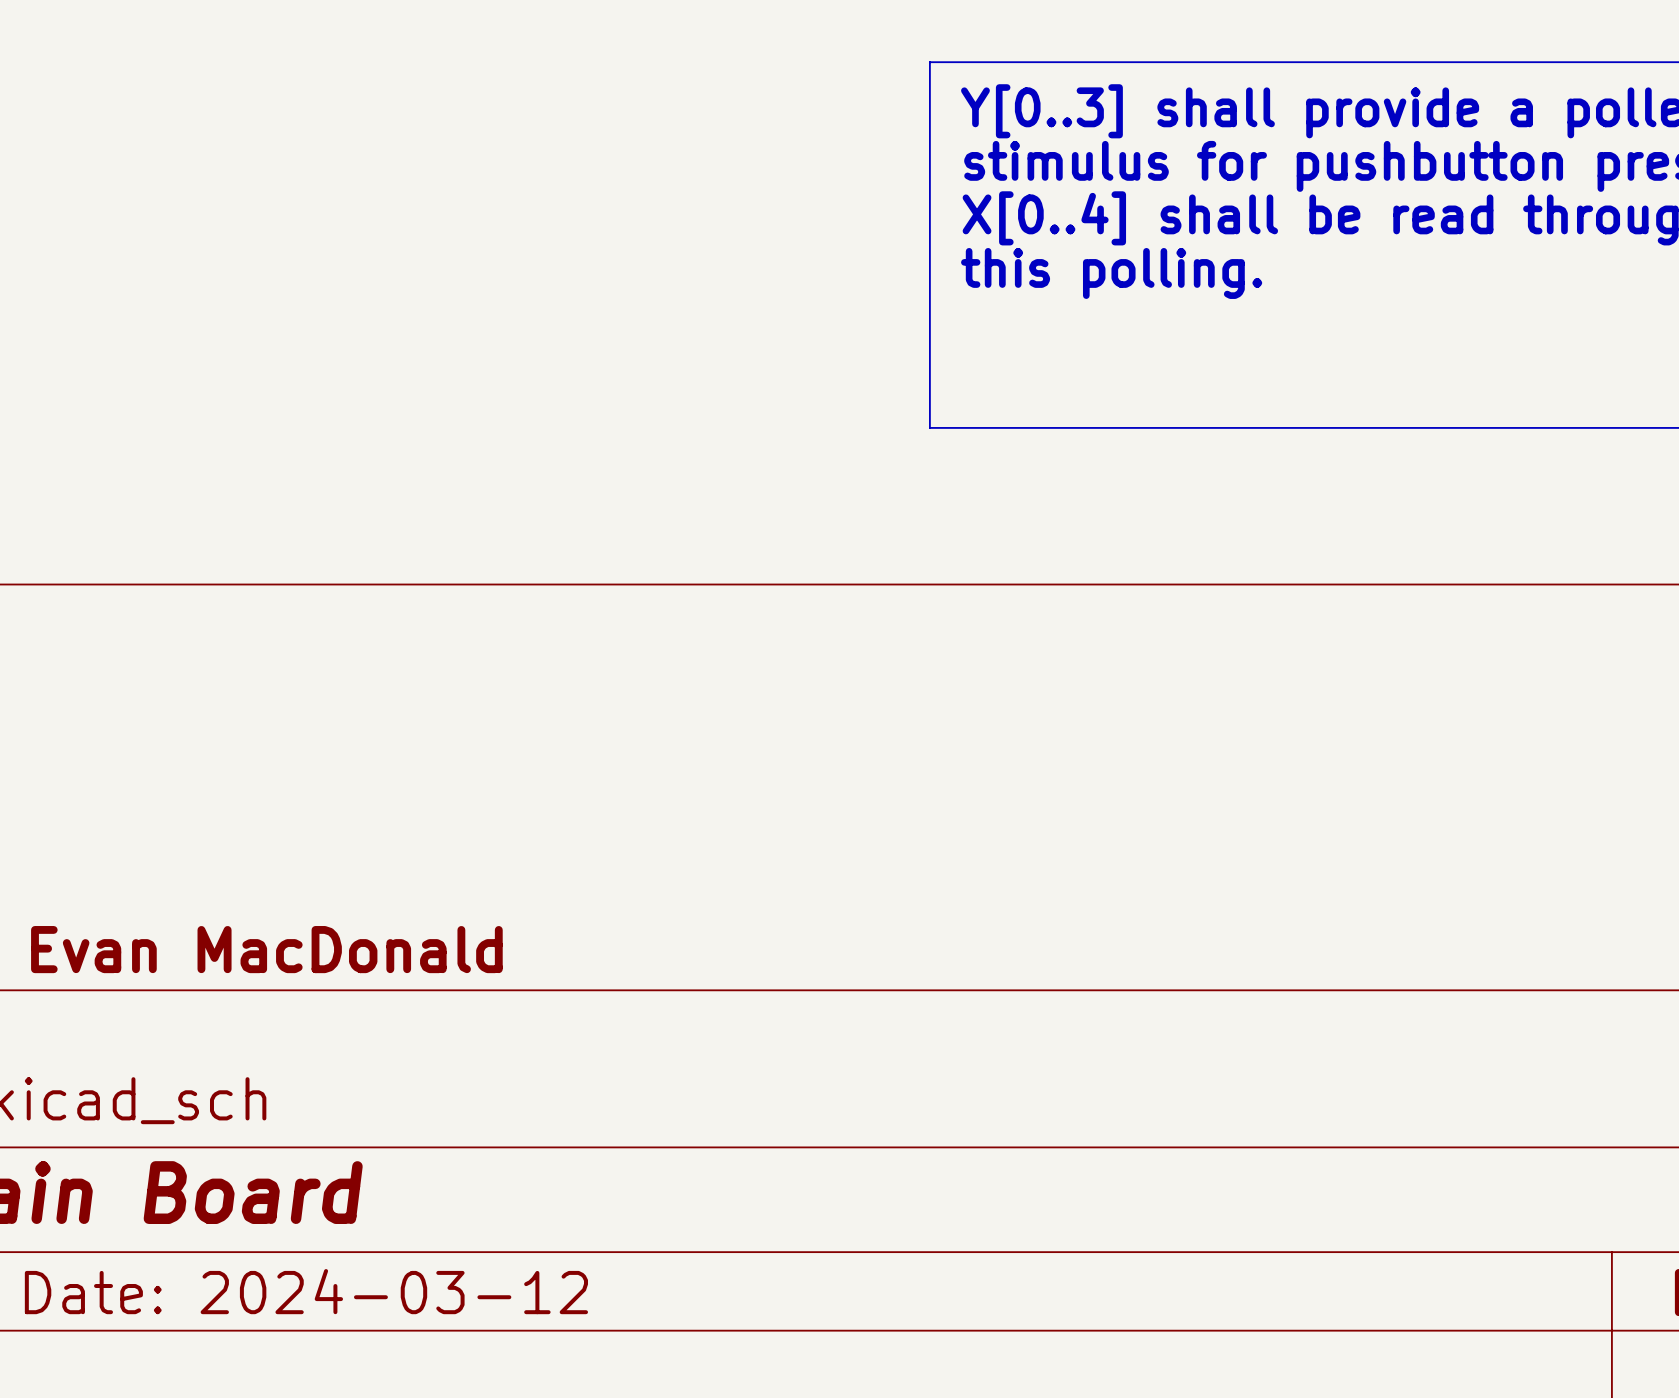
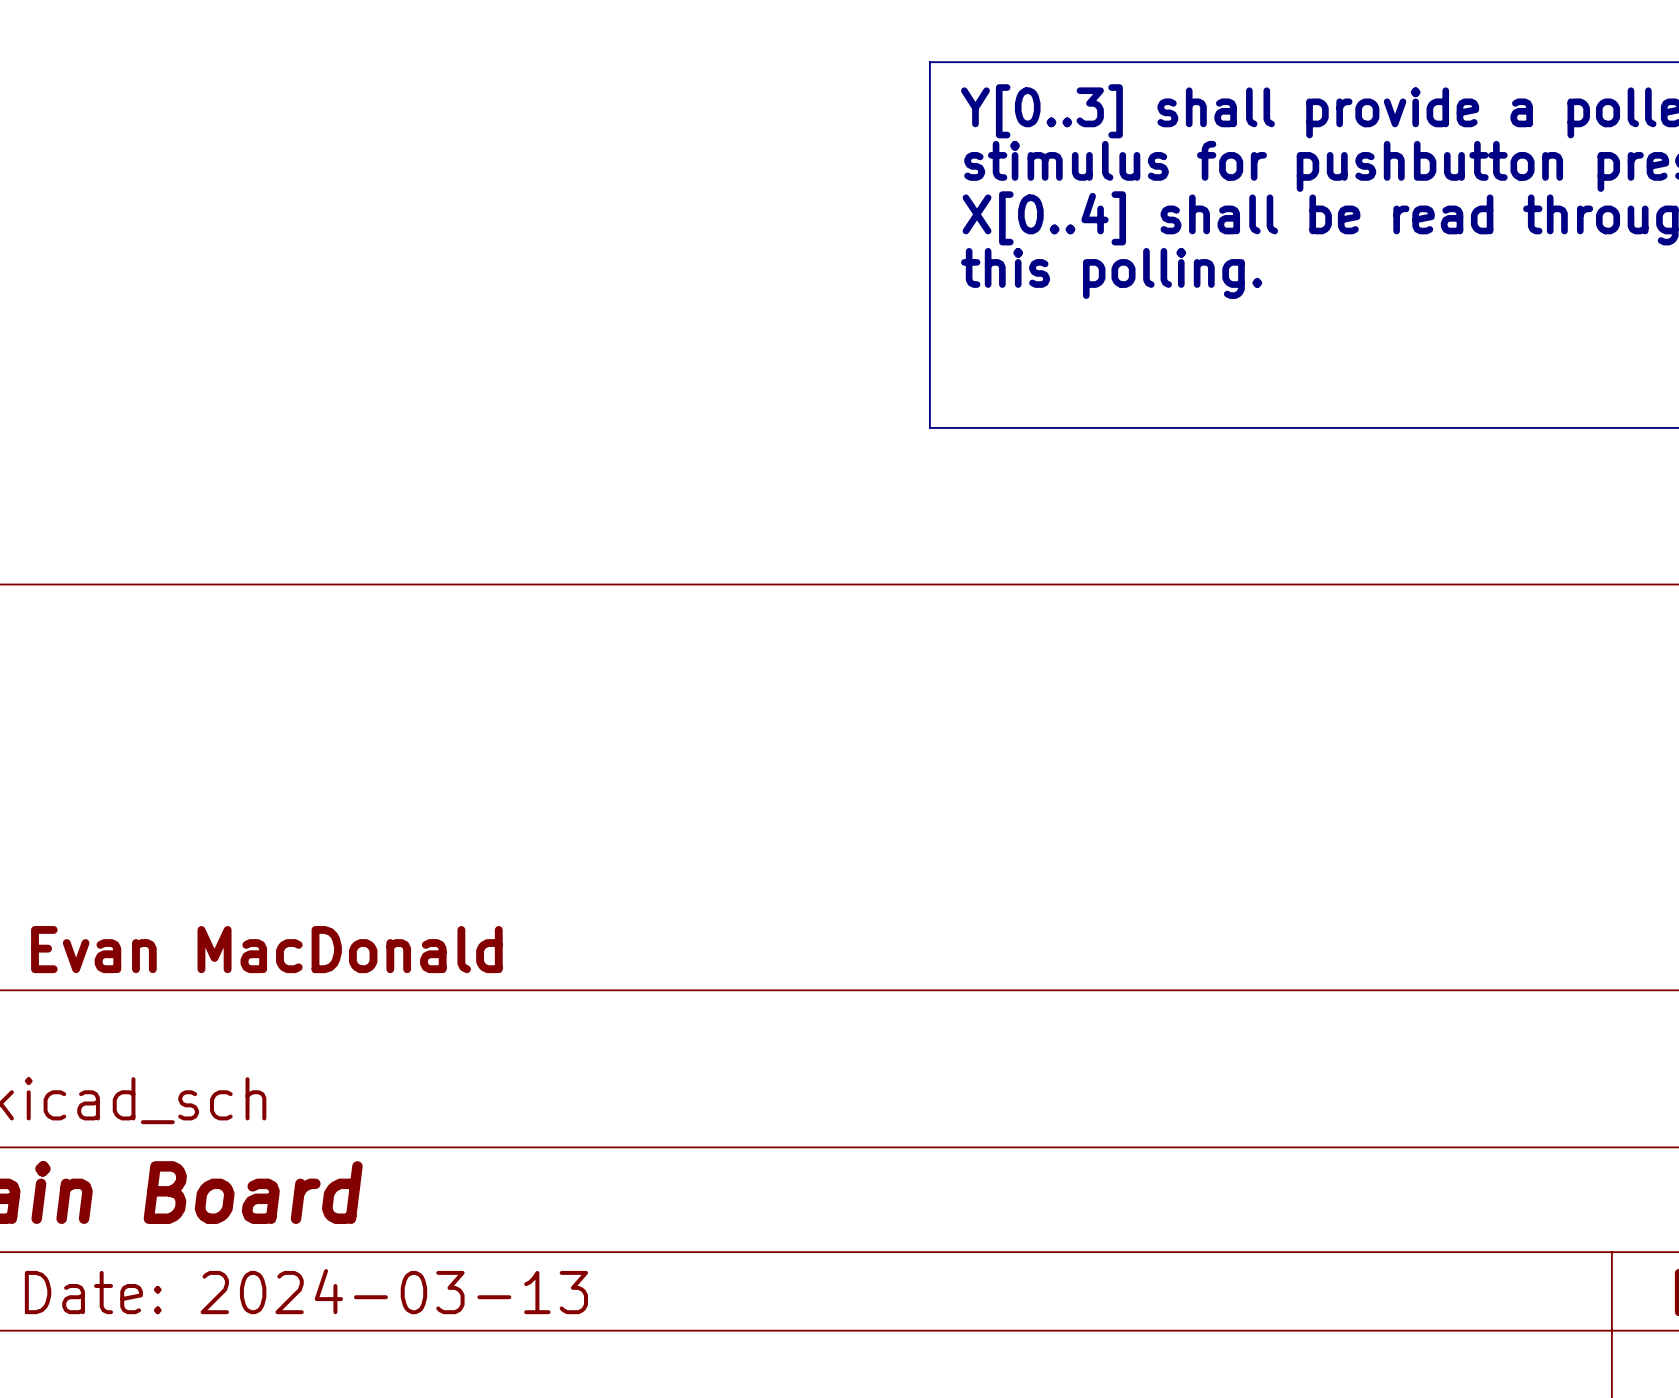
title block: Date: 2024-03-12 (306, 1291) -> Date: 2024-03-13 (306, 1291)

